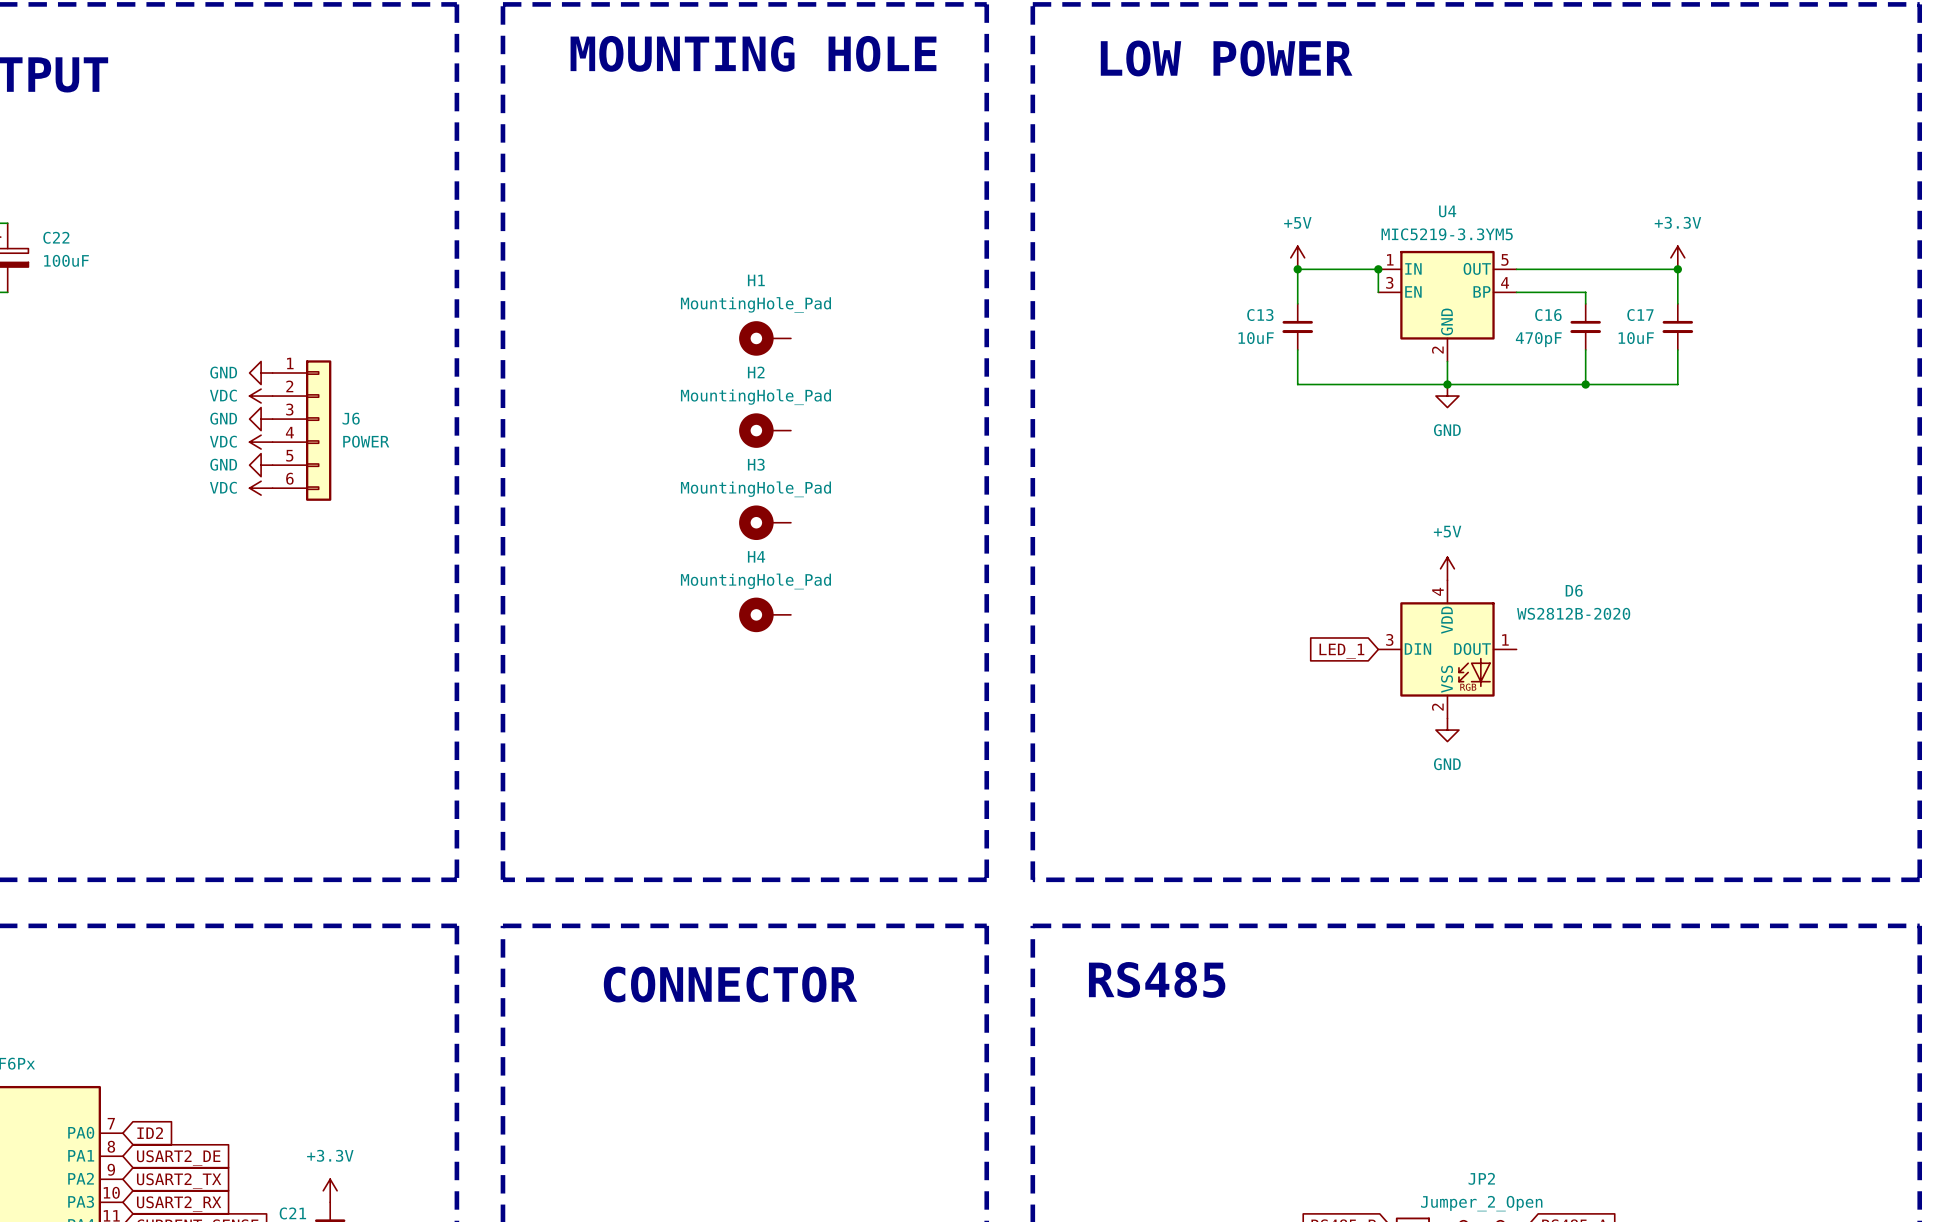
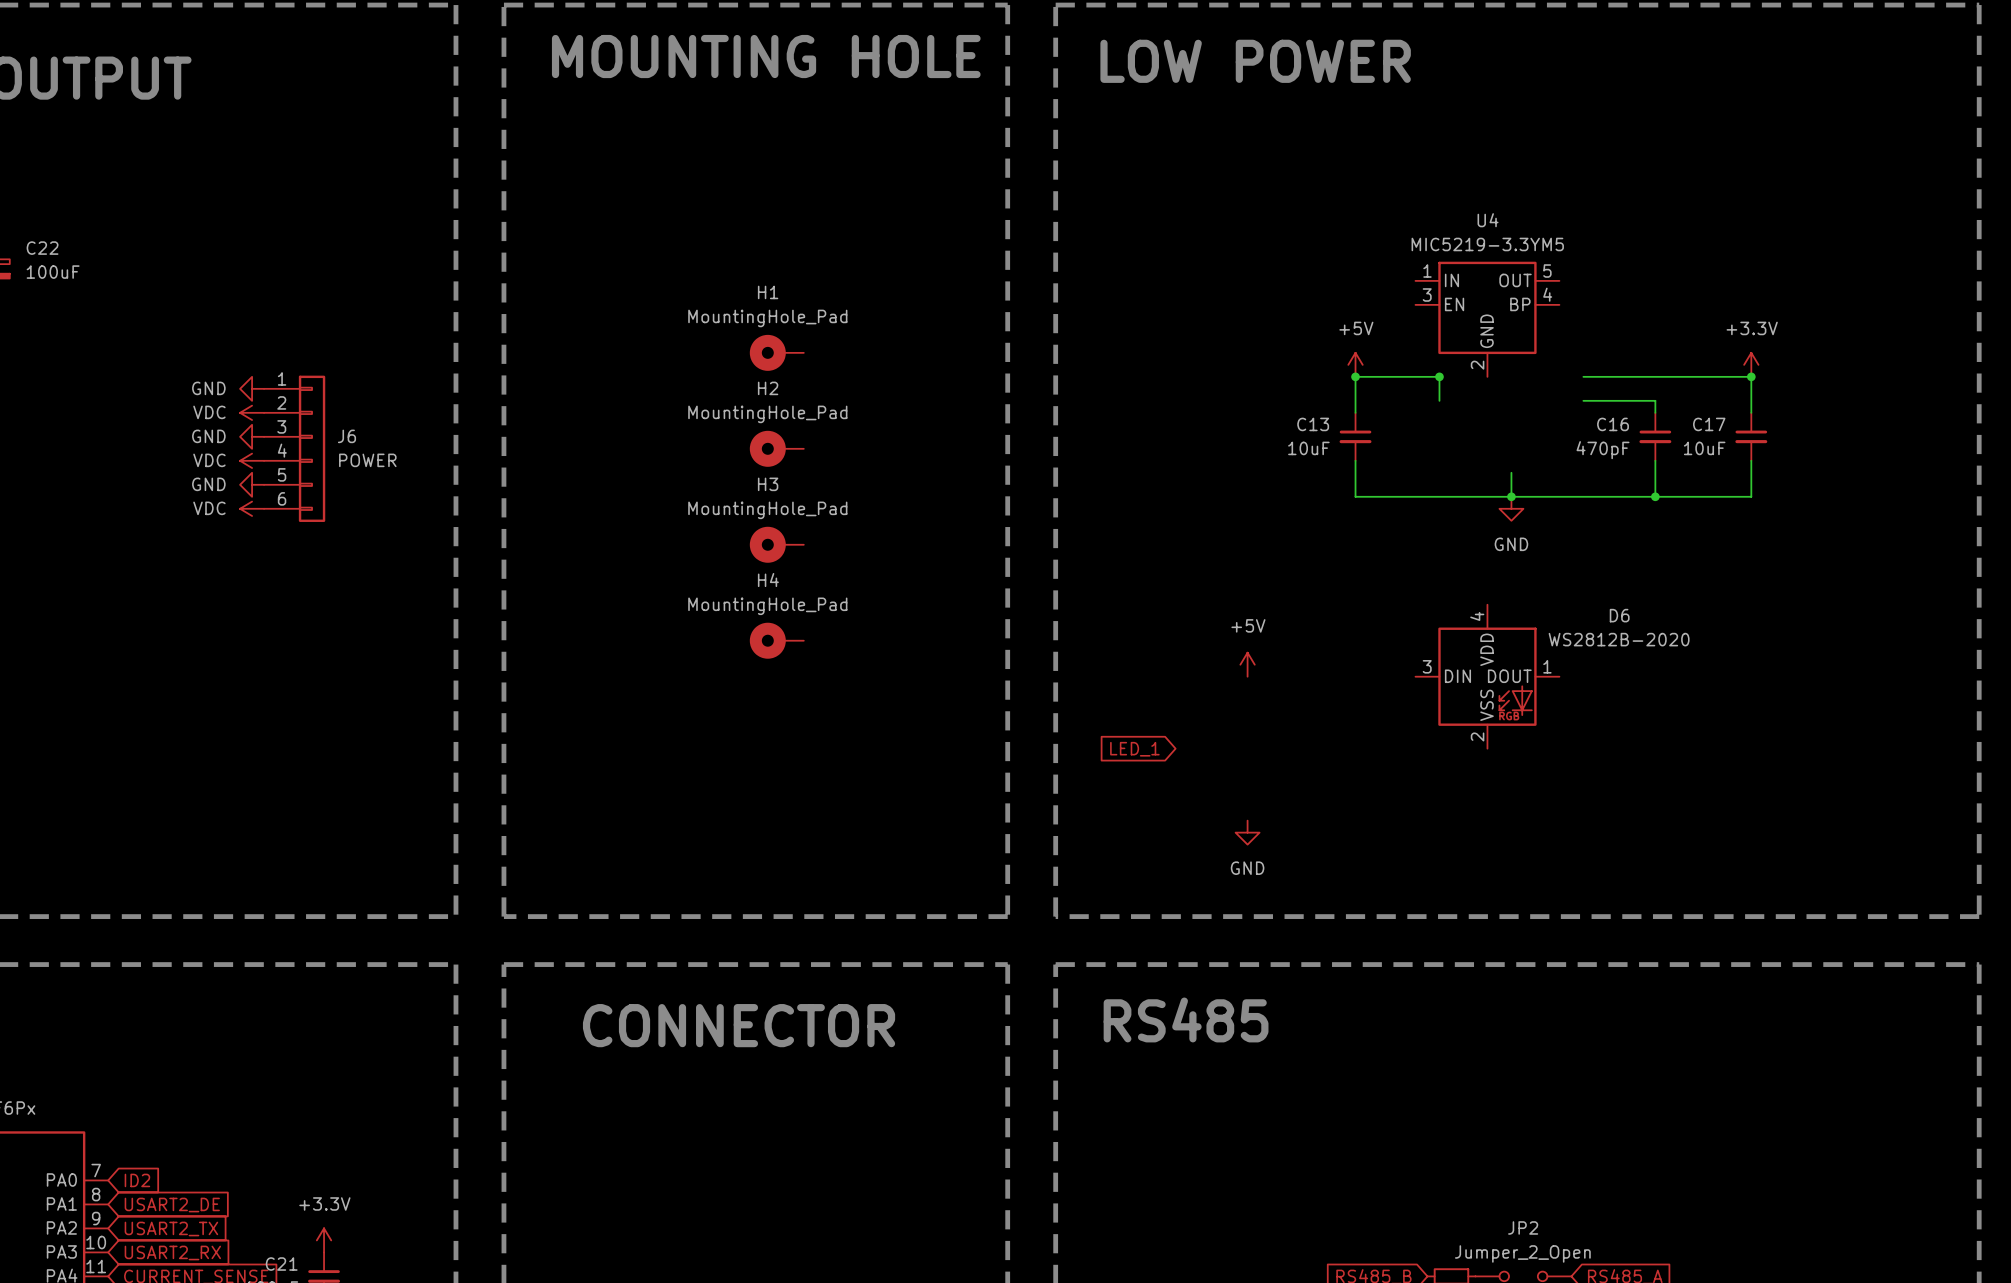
power symbol position: +5V (1297, 257) -> +5V (1355, 364)
power symbol position: +3.3V (1677, 257) -> +3.3V (1751, 364)
junction: (1297, 269) -> none
junction: (1378, 269) -> none
wire: (1516, 269) (1677, 269) (1677, 303) -> (1583, 376) (1751, 376) (1751, 412)
junction: (1677, 269) -> none
wire: (1378, 292) (1378, 269) (1297, 269) (1297, 303) -> (1439, 400) (1439, 376) (1355, 376) (1355, 412)
wire: (1516, 292) (1585, 292) (1585, 303) -> none
C13 position: (1297, 326) -> (1355, 436)
C16 position: (1585, 326) -> (1655, 436)
C17 position: (1677, 326) -> (1751, 436)
wire: (1297, 349) (1297, 384) (1539, 384) -> none
wire: (1585, 349) (1585, 384) -> (1655, 460) (1655, 496)
wire: (1677, 349) (1677, 384) (1608, 384) -> (1655, 412) (1655, 400)
junction: none -> (1355, 376)
junction: none -> (1439, 376)
wire: (1447, 361) (1447, 384) -> (1511, 472) (1511, 496)
junction: none -> (1751, 376)
junction: (1447, 384) -> none
junction: (1585, 384) -> none
power symbol position: GND (1447, 396) -> GND (1511, 508)
wire: none -> (1355, 460) (1355, 496) (1751, 496) (1751, 460)
junction: none -> (1511, 496)
junction: none -> (1655, 496)
power symbol: +5V (1447, 568) -> none
power symbol: none -> +5V (1247, 664)
global label: LED_1 (1341, 651) -> none
global label: none -> LED_1 (1134, 749)
power symbol: GND (1447, 730) -> none
power symbol: none -> GND (1247, 832)

